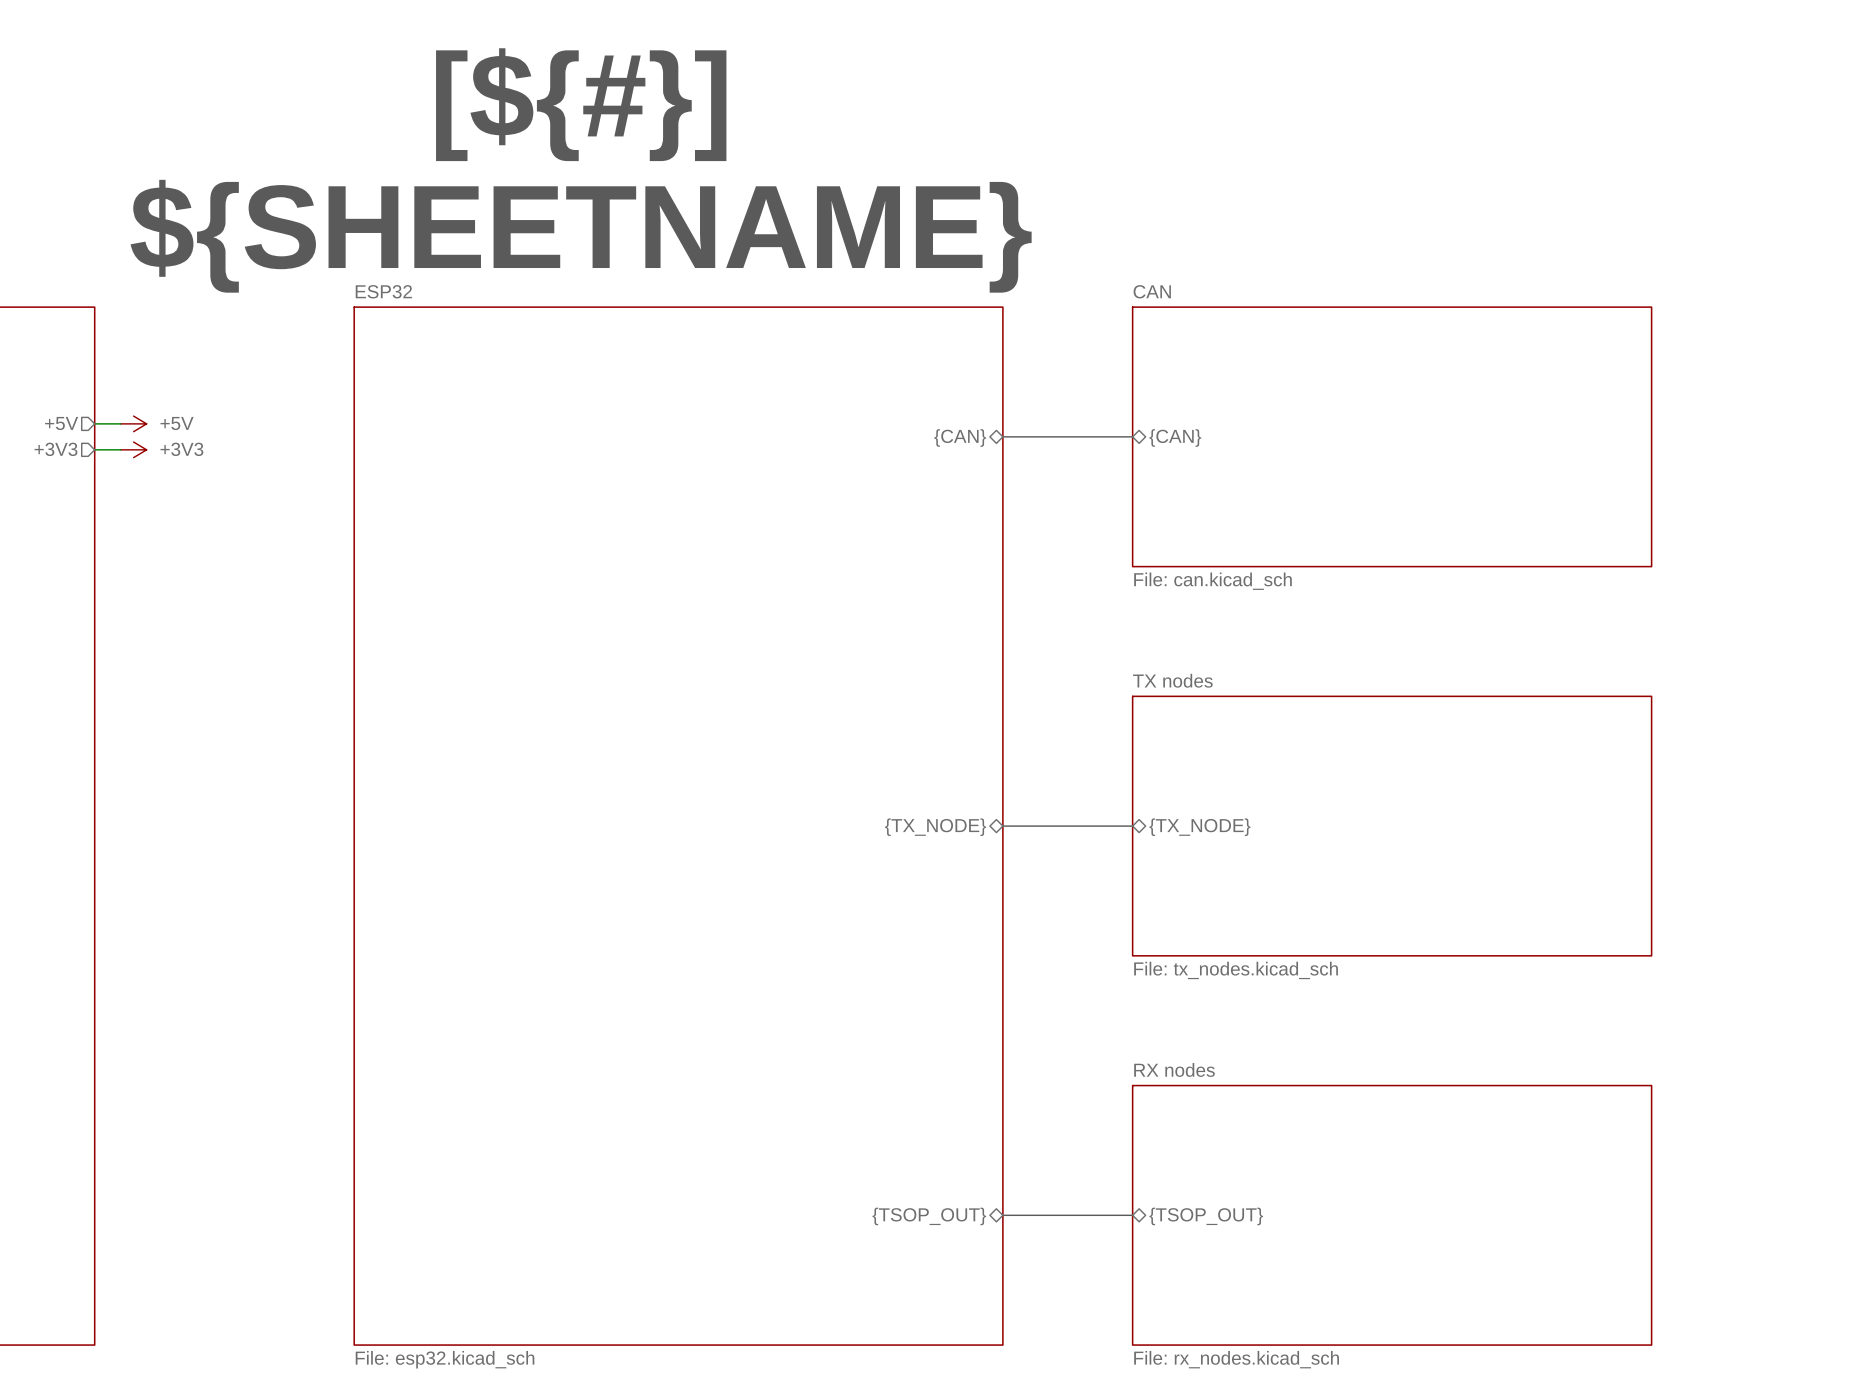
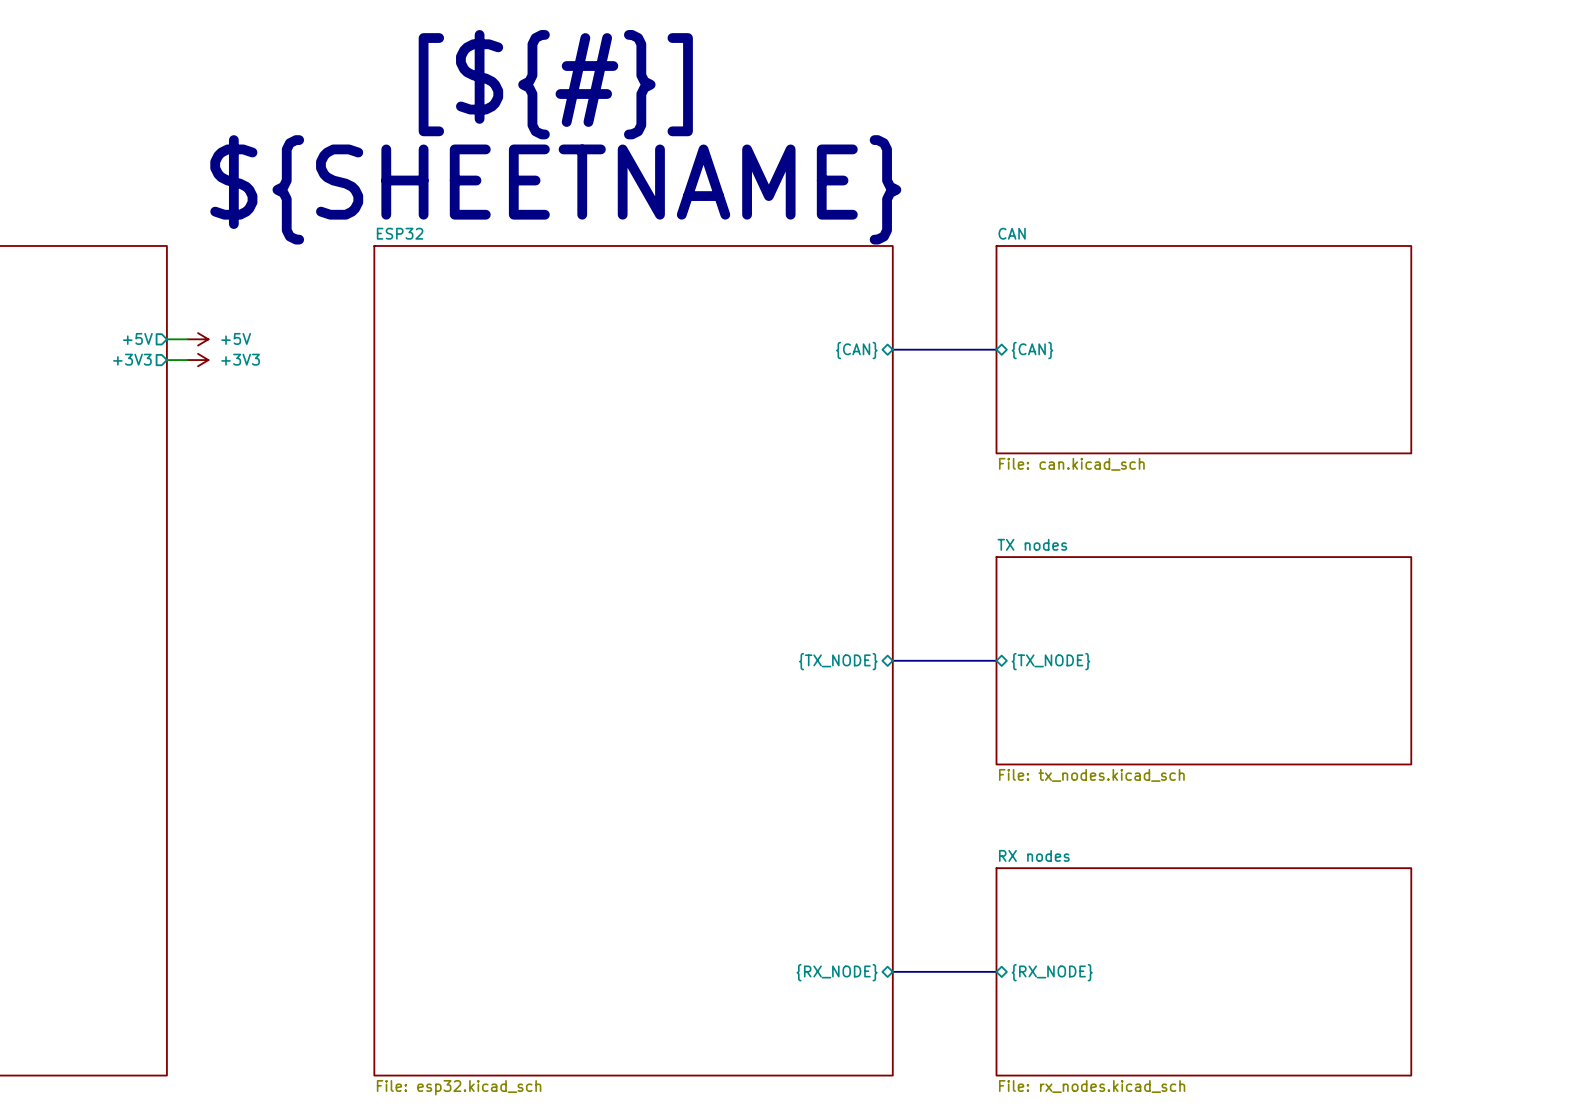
sheet pin: {TSOP_OUT} (929, 1216) -> {RX_NODE} (837, 972)
sheet pin: {TSOP_OUT} (1206, 1216) -> {RX_NODE} (1052, 972)

